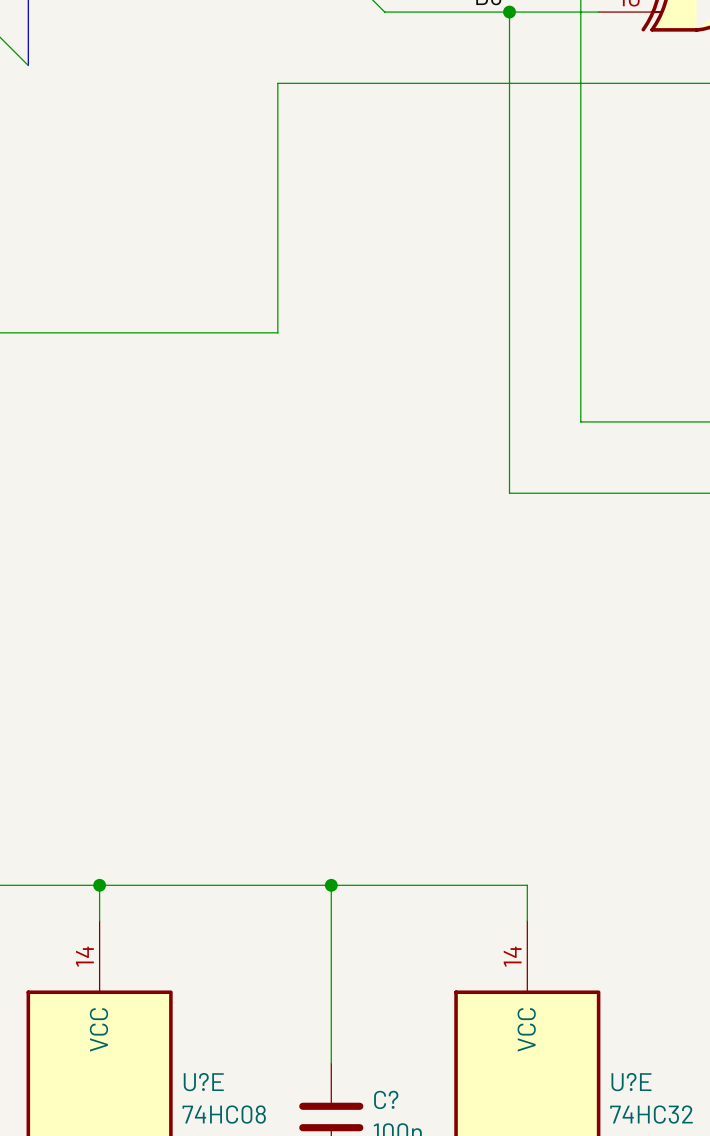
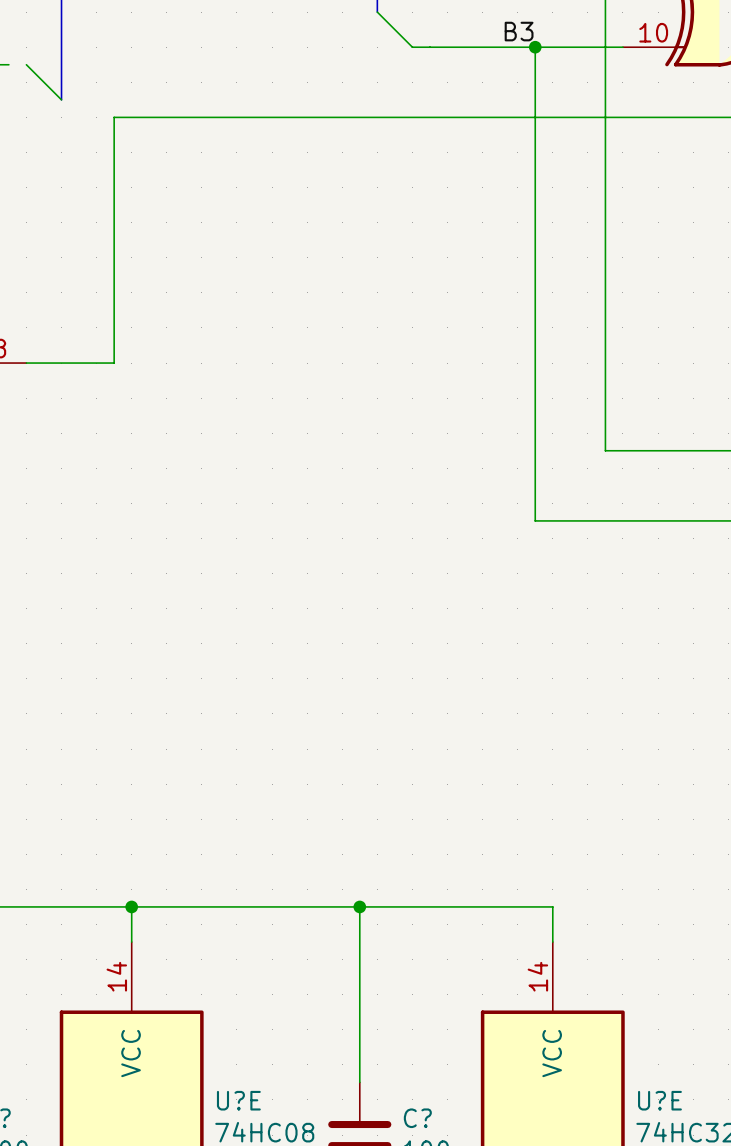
wire: (277, 83) (277, 332) (81, 332) -> (307, 117) (114, 117) (114, 363)

